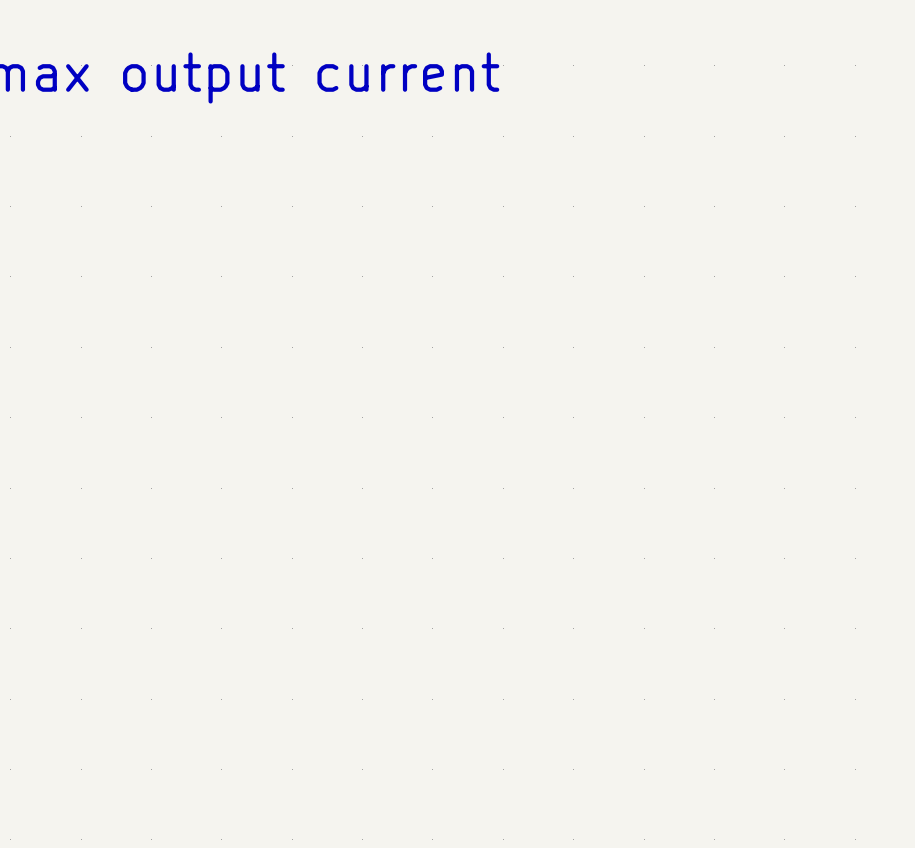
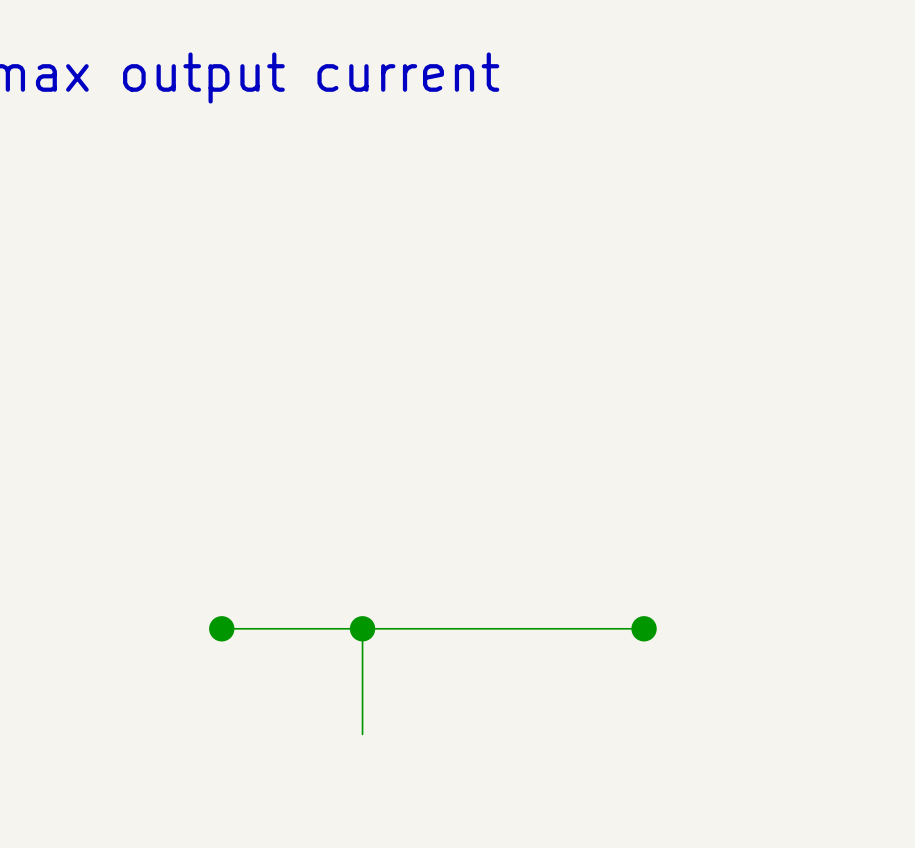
wire: none -> (221, 628) (644, 628)
junction: none -> (221, 628)
wire: none -> (362, 628) (362, 734)
junction: none -> (362, 628)
junction: none -> (644, 628)

